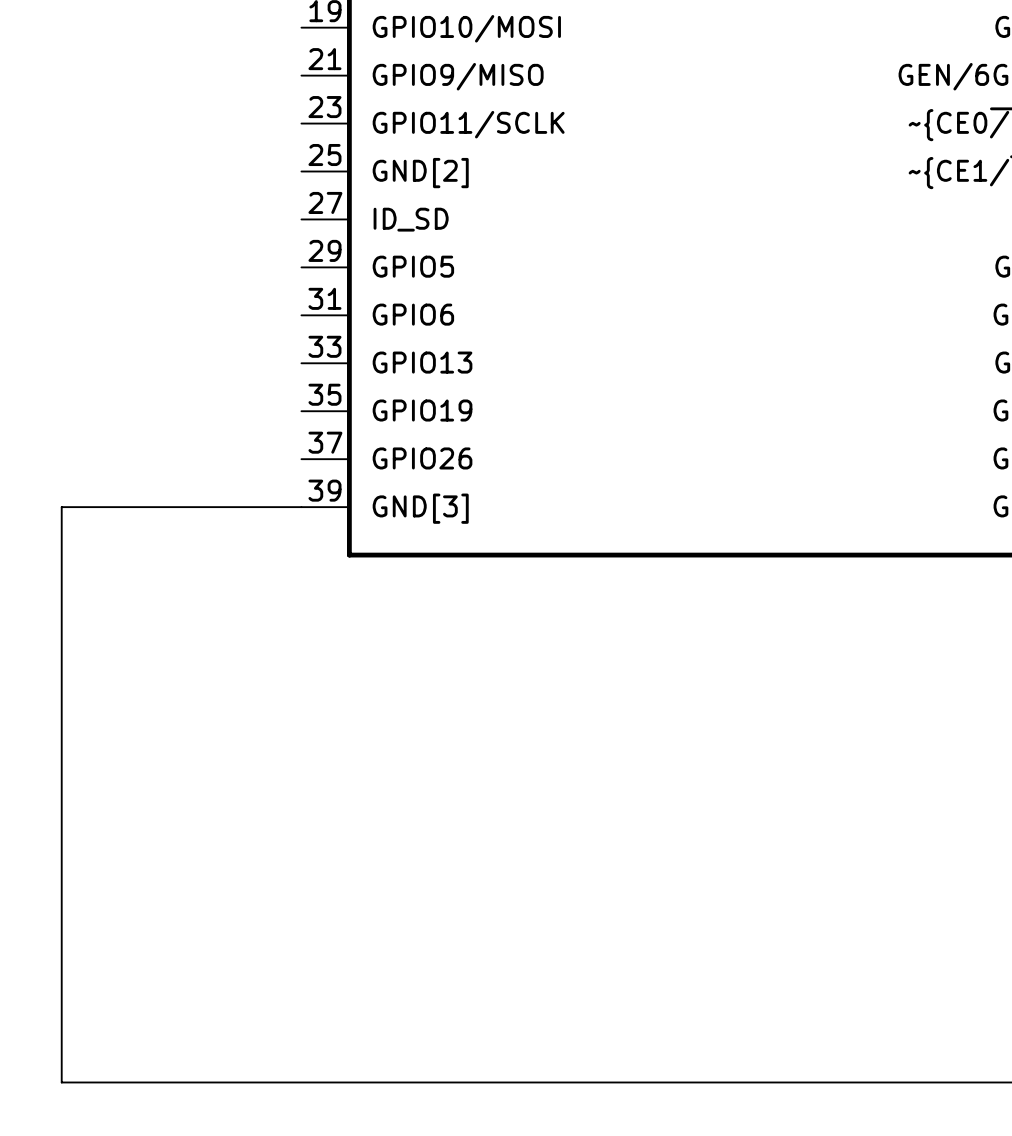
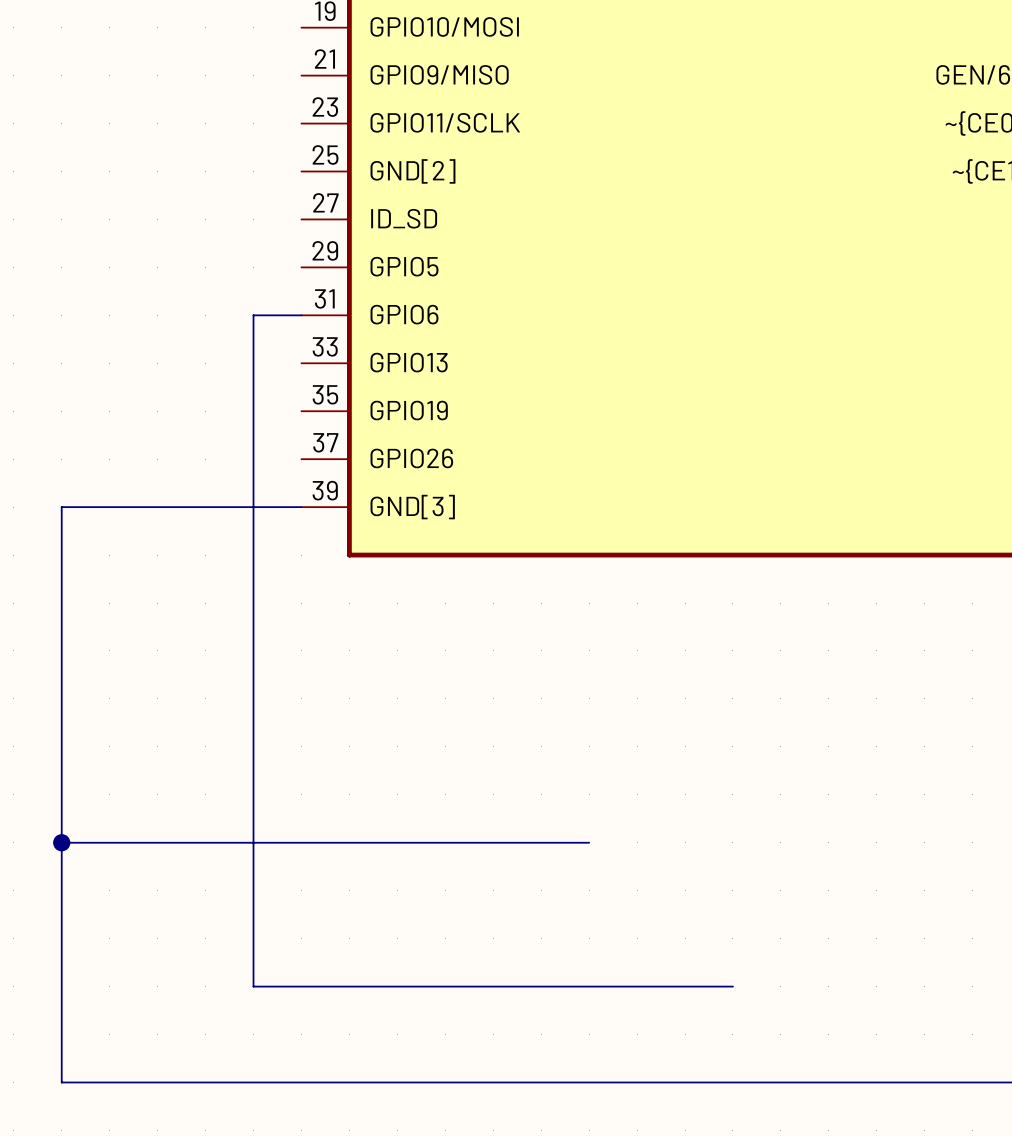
wire: none -> (301, 315) (253, 315) (253, 986) (732, 986)
wire: none -> (61, 842) (589, 842)
junction: none -> (61, 842)

